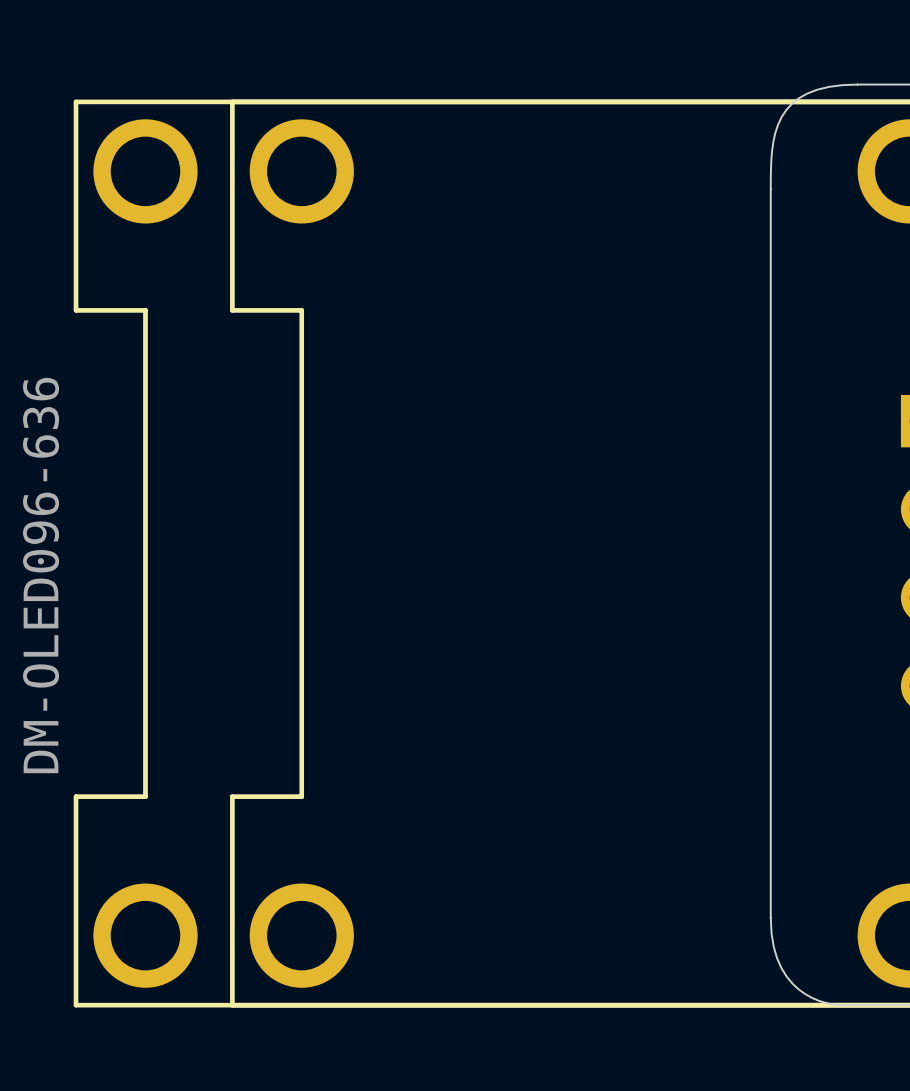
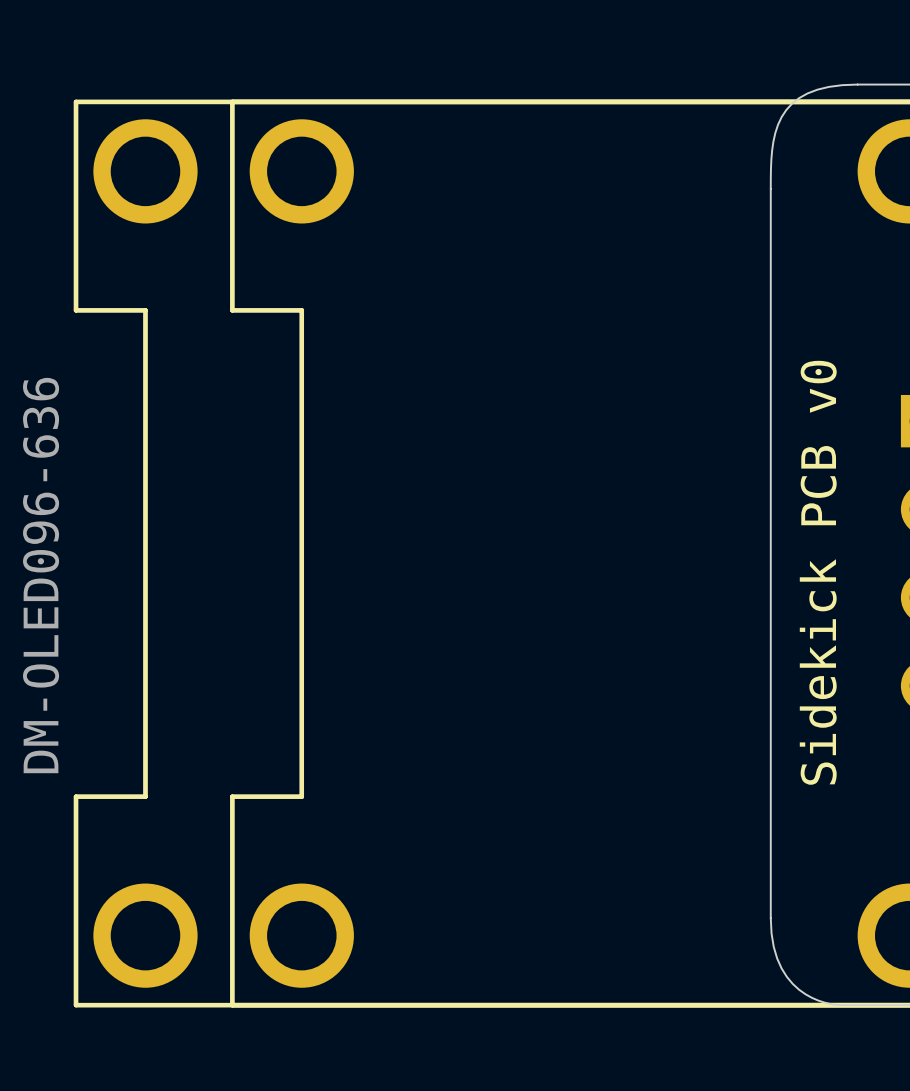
text: none -> Sidekick PCB v0 (818, 572)

